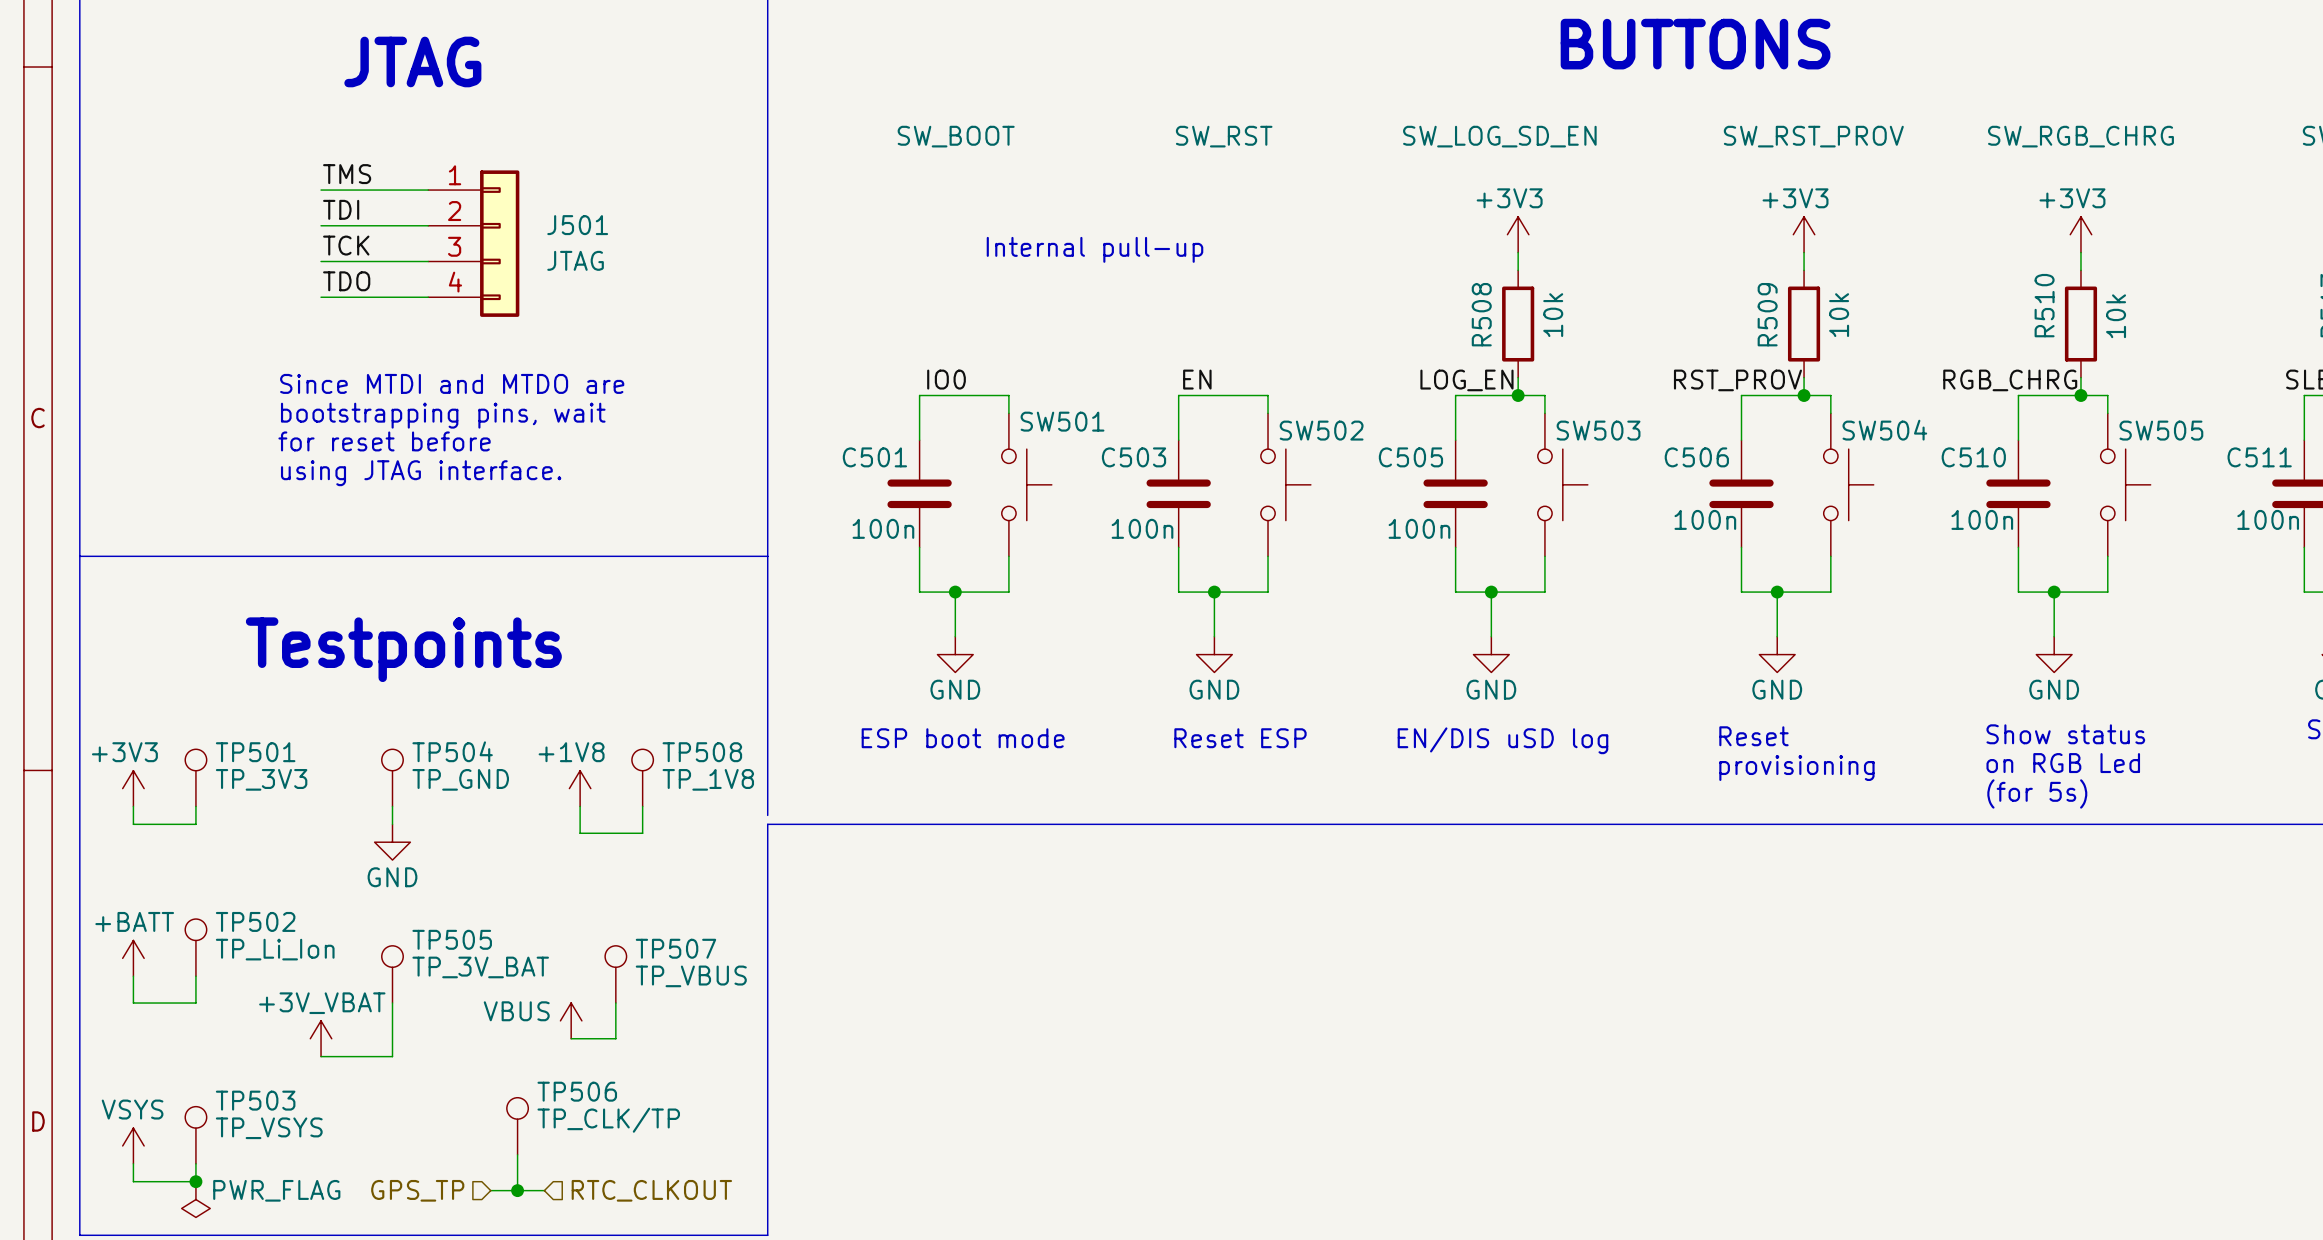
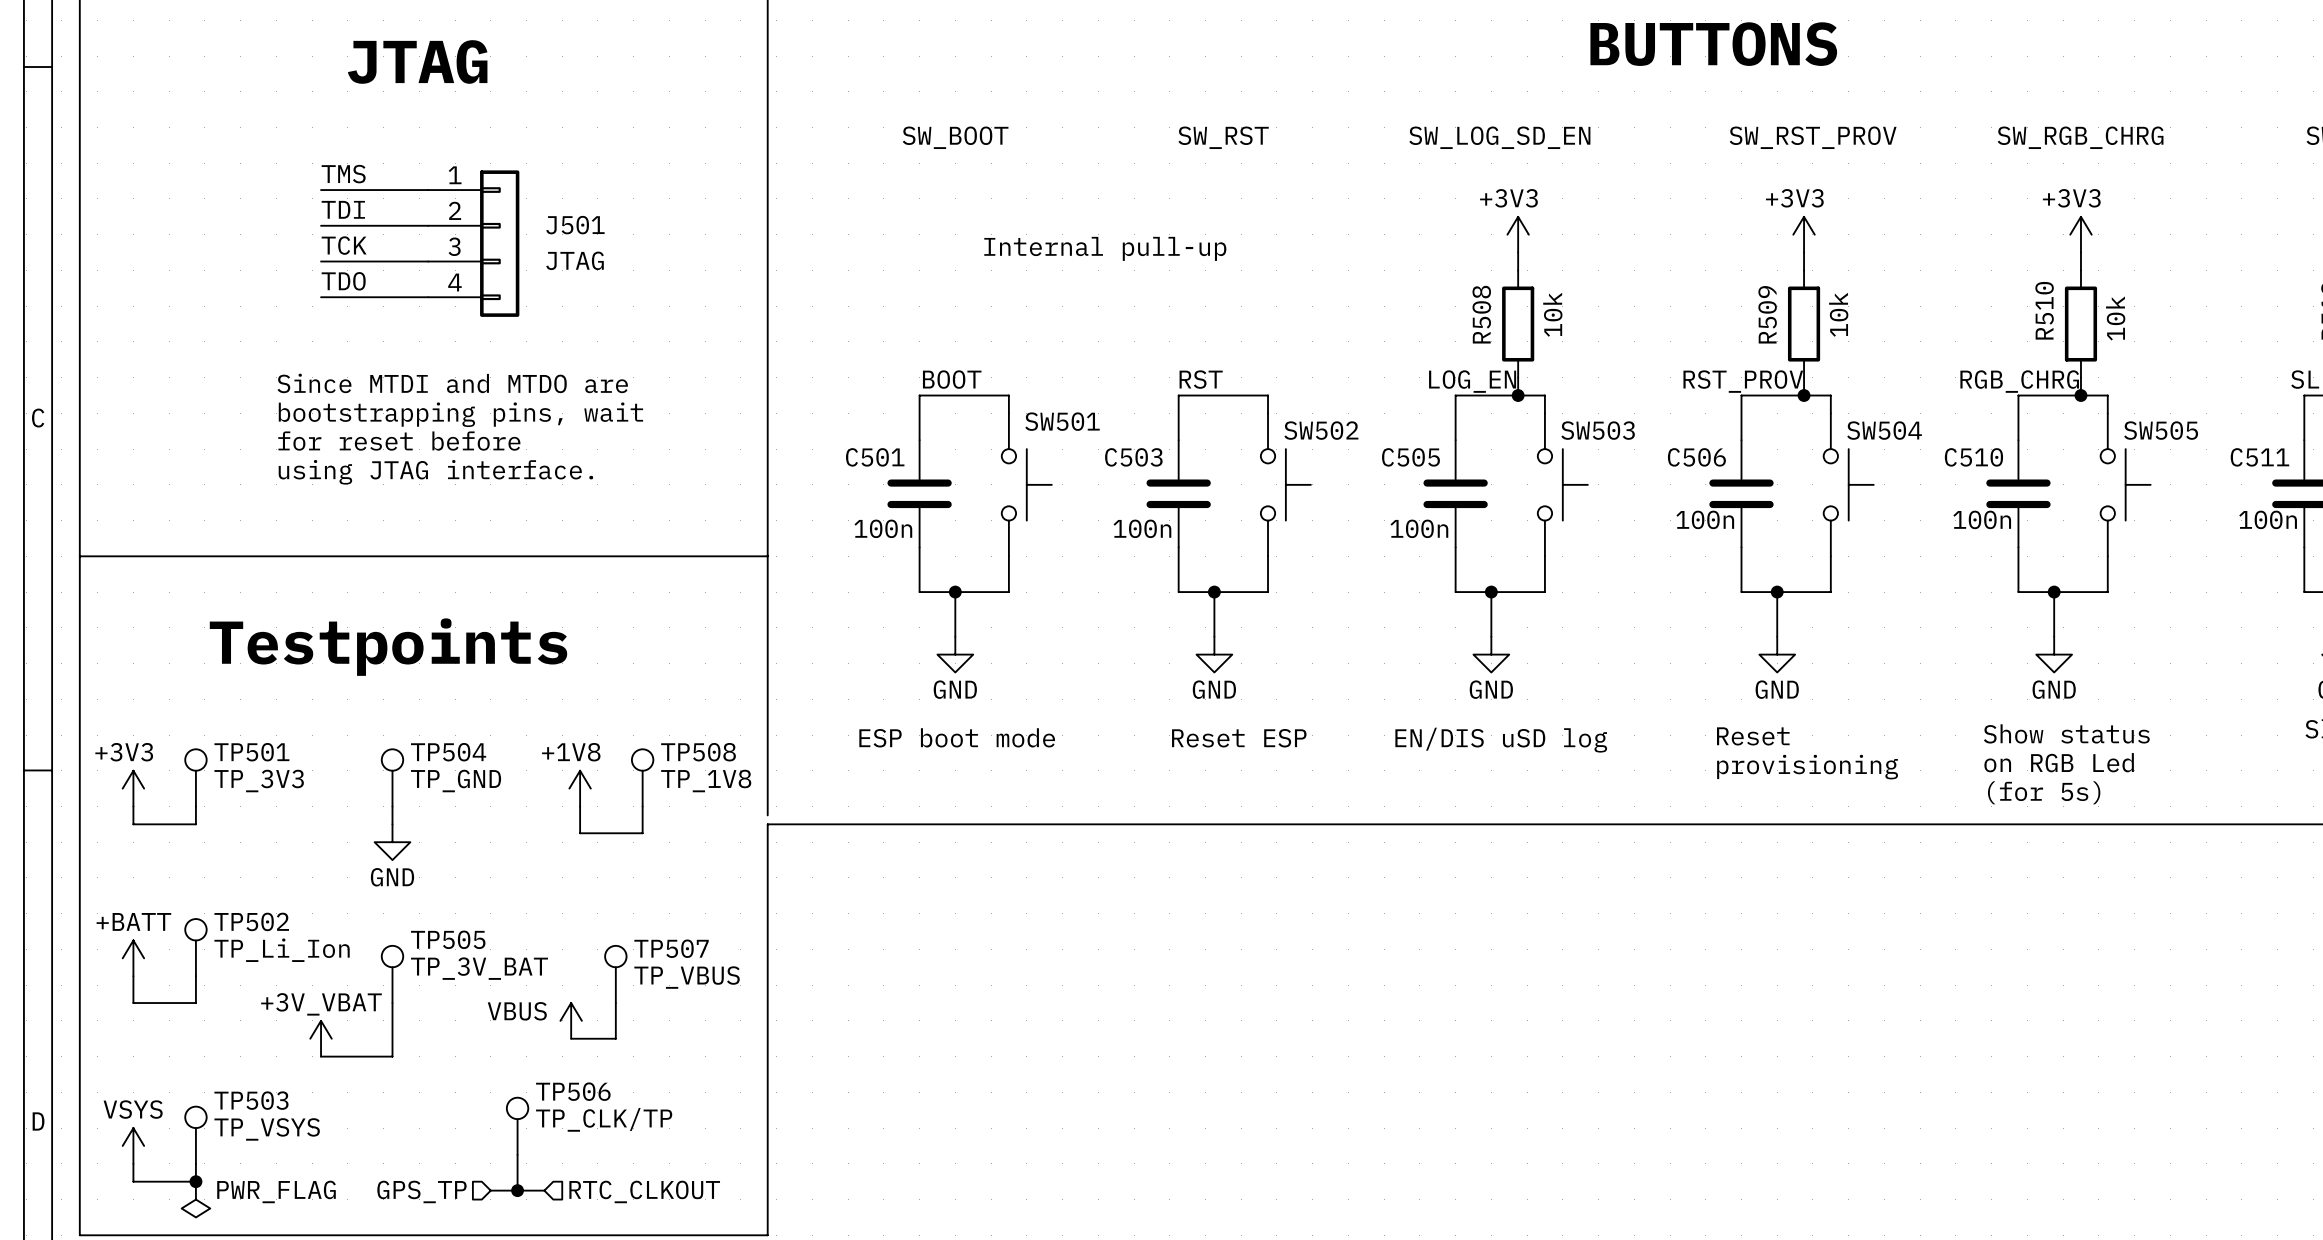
label: IO0 (946, 379) -> BOOT (952, 379)
label: EN (1197, 379) -> RST (1201, 379)

